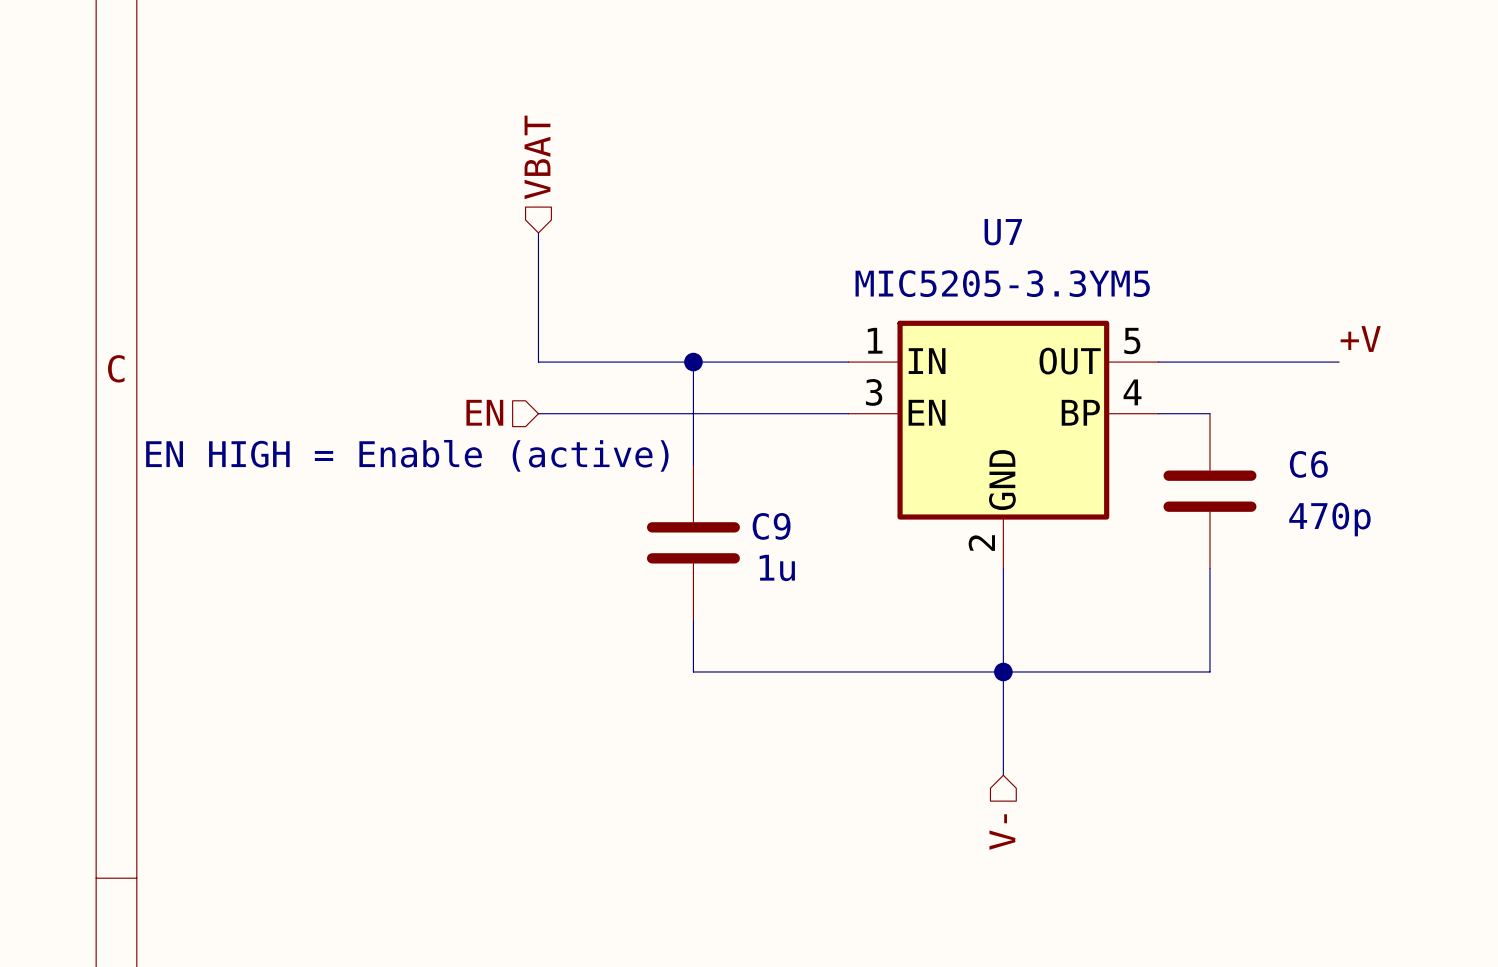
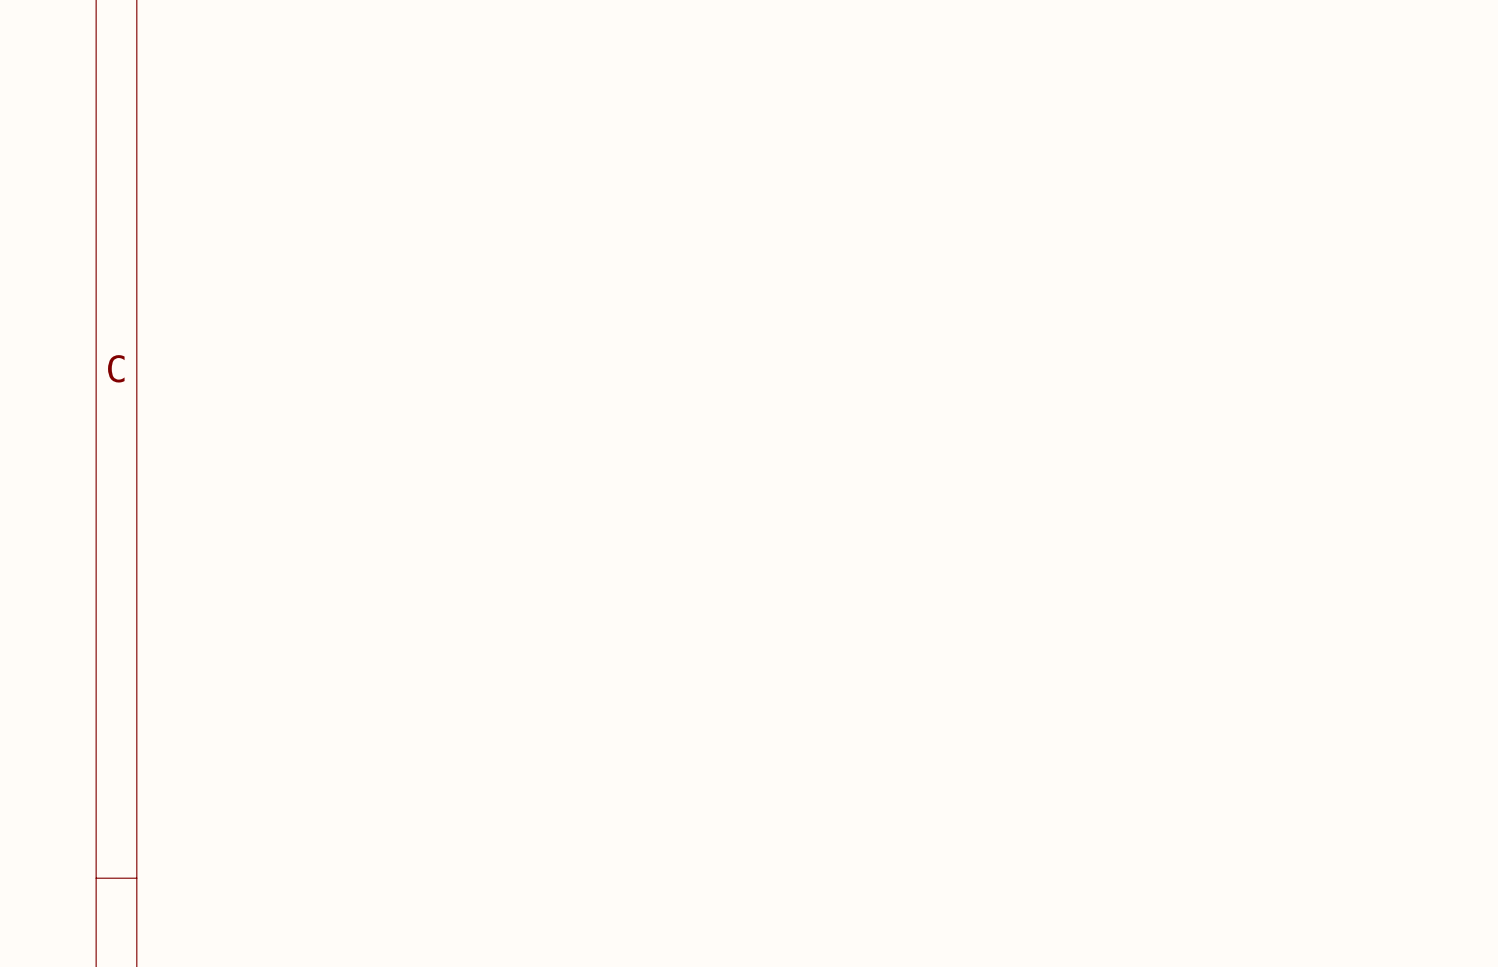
hierarchical label: VBAT (537, 157) -> none
wire: (538, 232) (538, 362) (848, 362) -> none
label: +V (1360, 339) -> none
wire: (693, 362) (693, 465) -> none
junction: (693, 362) -> none
wire: (1158, 362) (1339, 362) -> none
hierarchical label: EN (484, 412) -> none
wire: (538, 413) (848, 413) -> none
wire: (1158, 413) (1209, 413) -> none
U7: MIC5205-3.3YM5 (1003, 444) -> none
text: EN HIGH = Enable (active) (407, 455) -> none
C6: 470p (1209, 491) -> none
C9: 1u (693, 542) -> none
wire: (1003, 568) (1003, 775) -> none
wire: (1209, 568) (1209, 671) (693, 671) (693, 620) -> none
junction: (1003, 671) -> none
hierarchical label: V- (1002, 832) -> none

